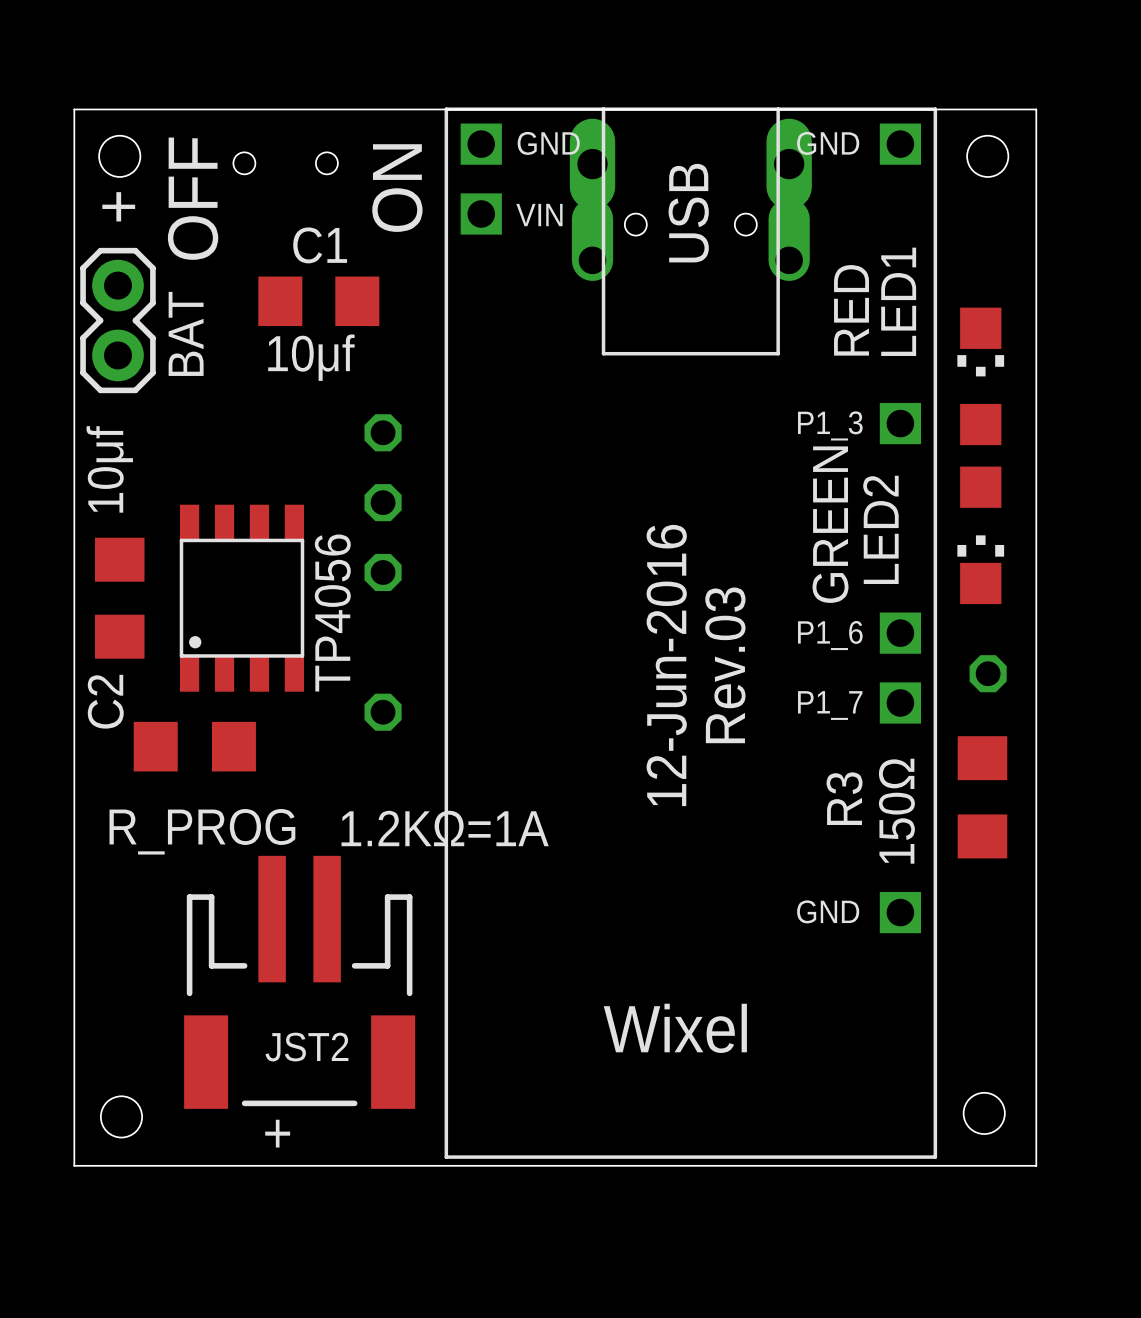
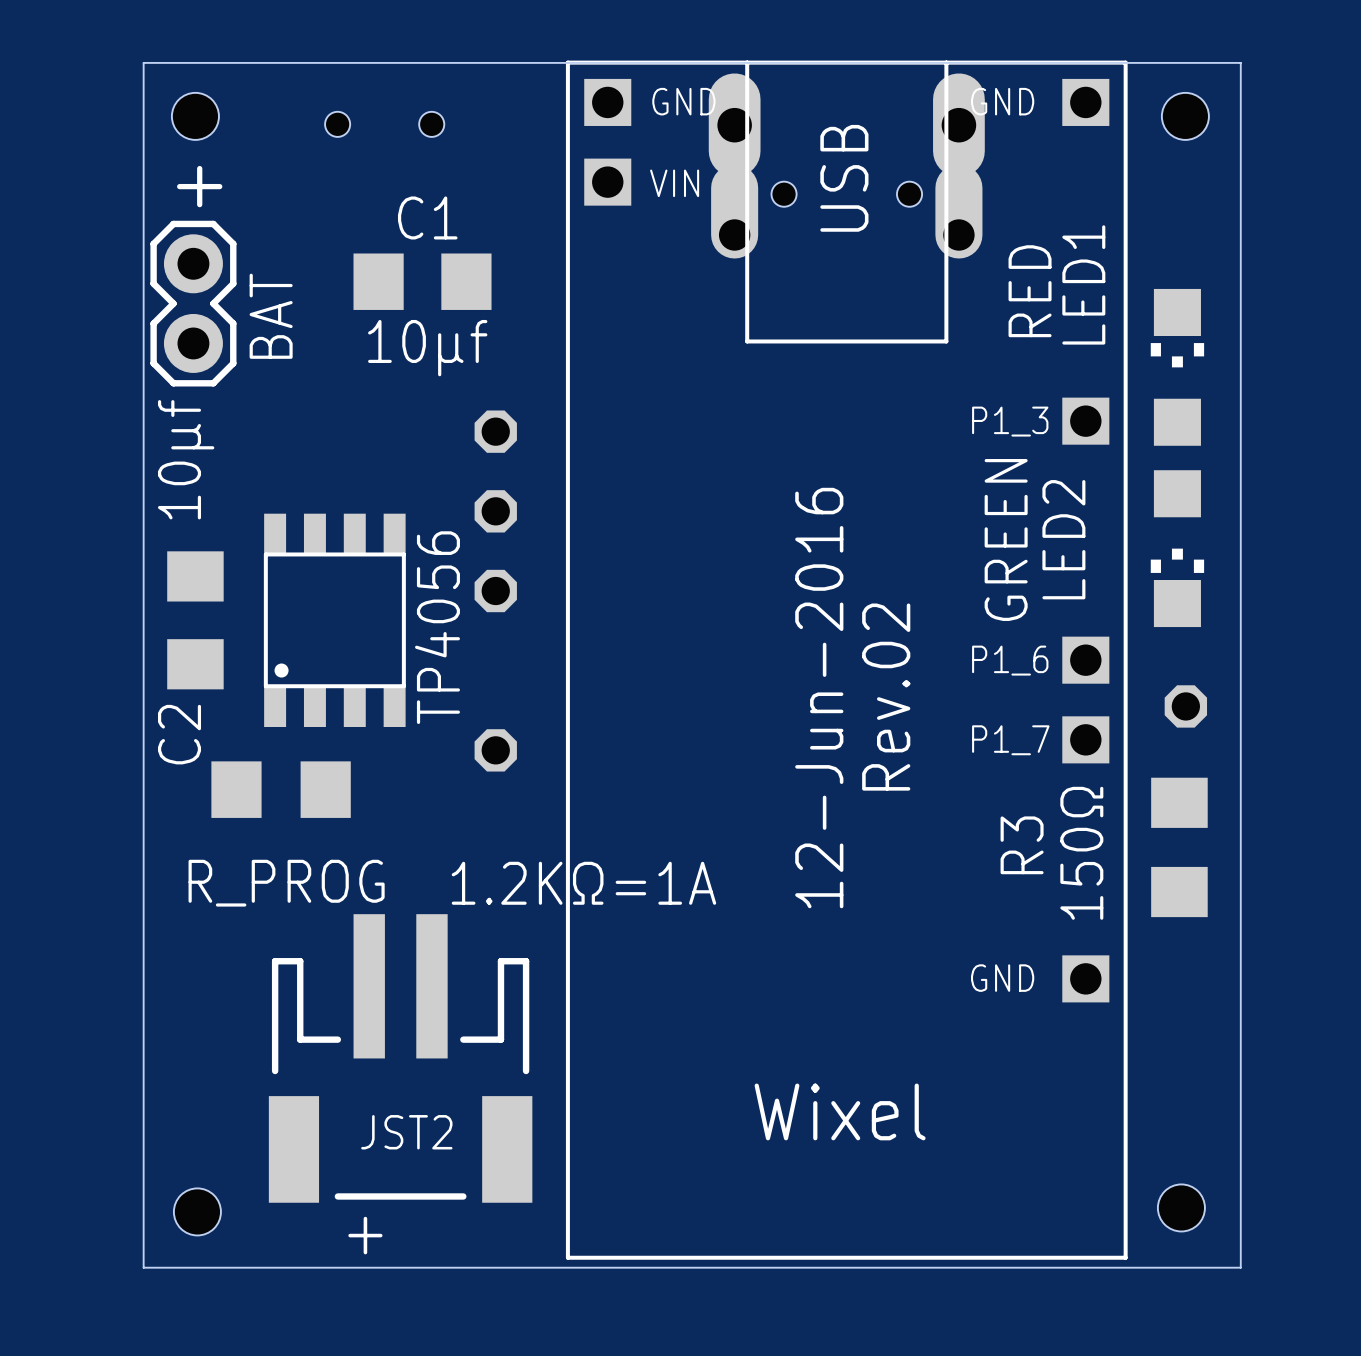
text: ON (397, 188) -> none
text: OFF (193, 198) -> none
text: Rev.03 (725, 665) -> Rev.02 (886, 697)

